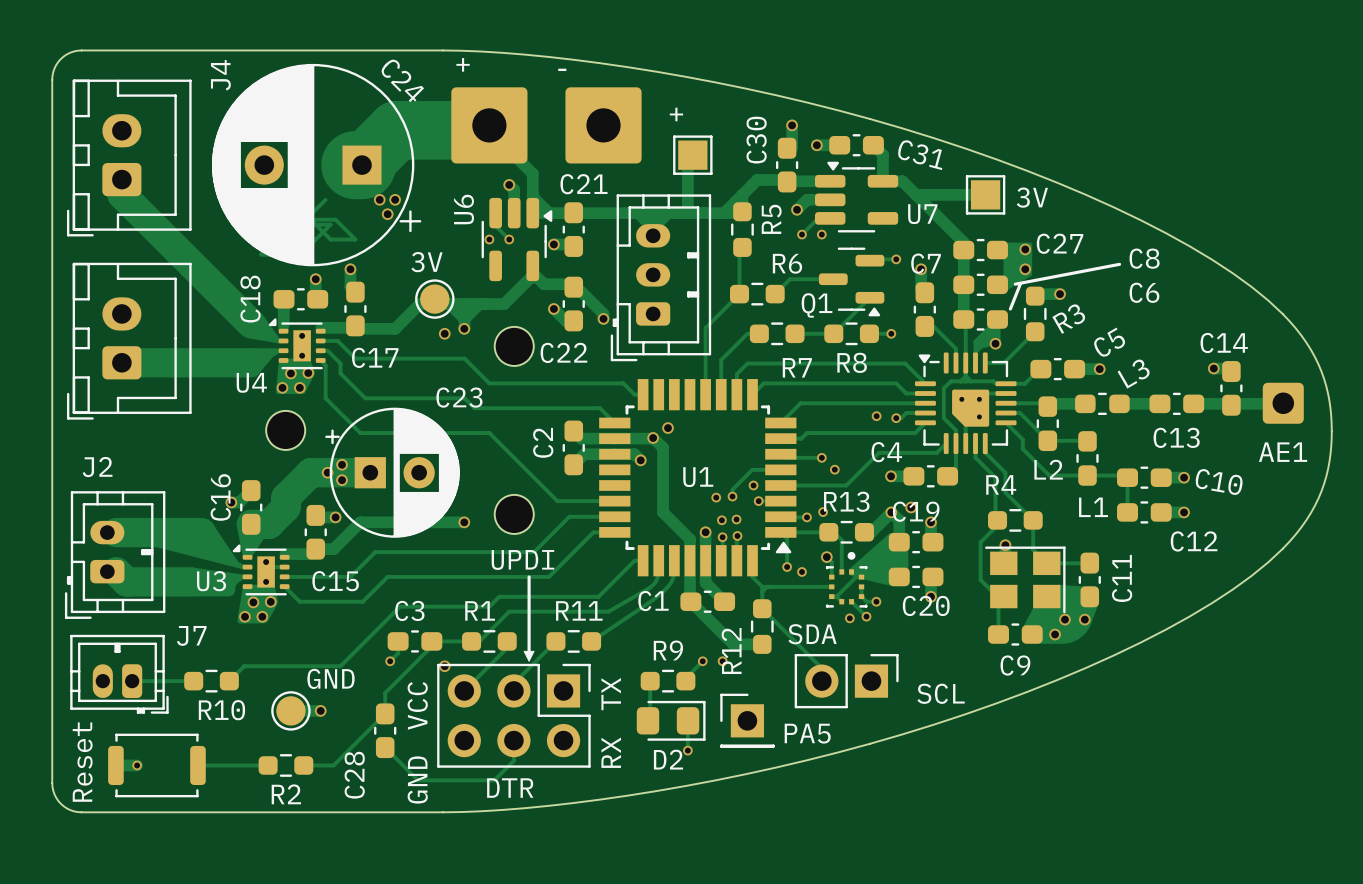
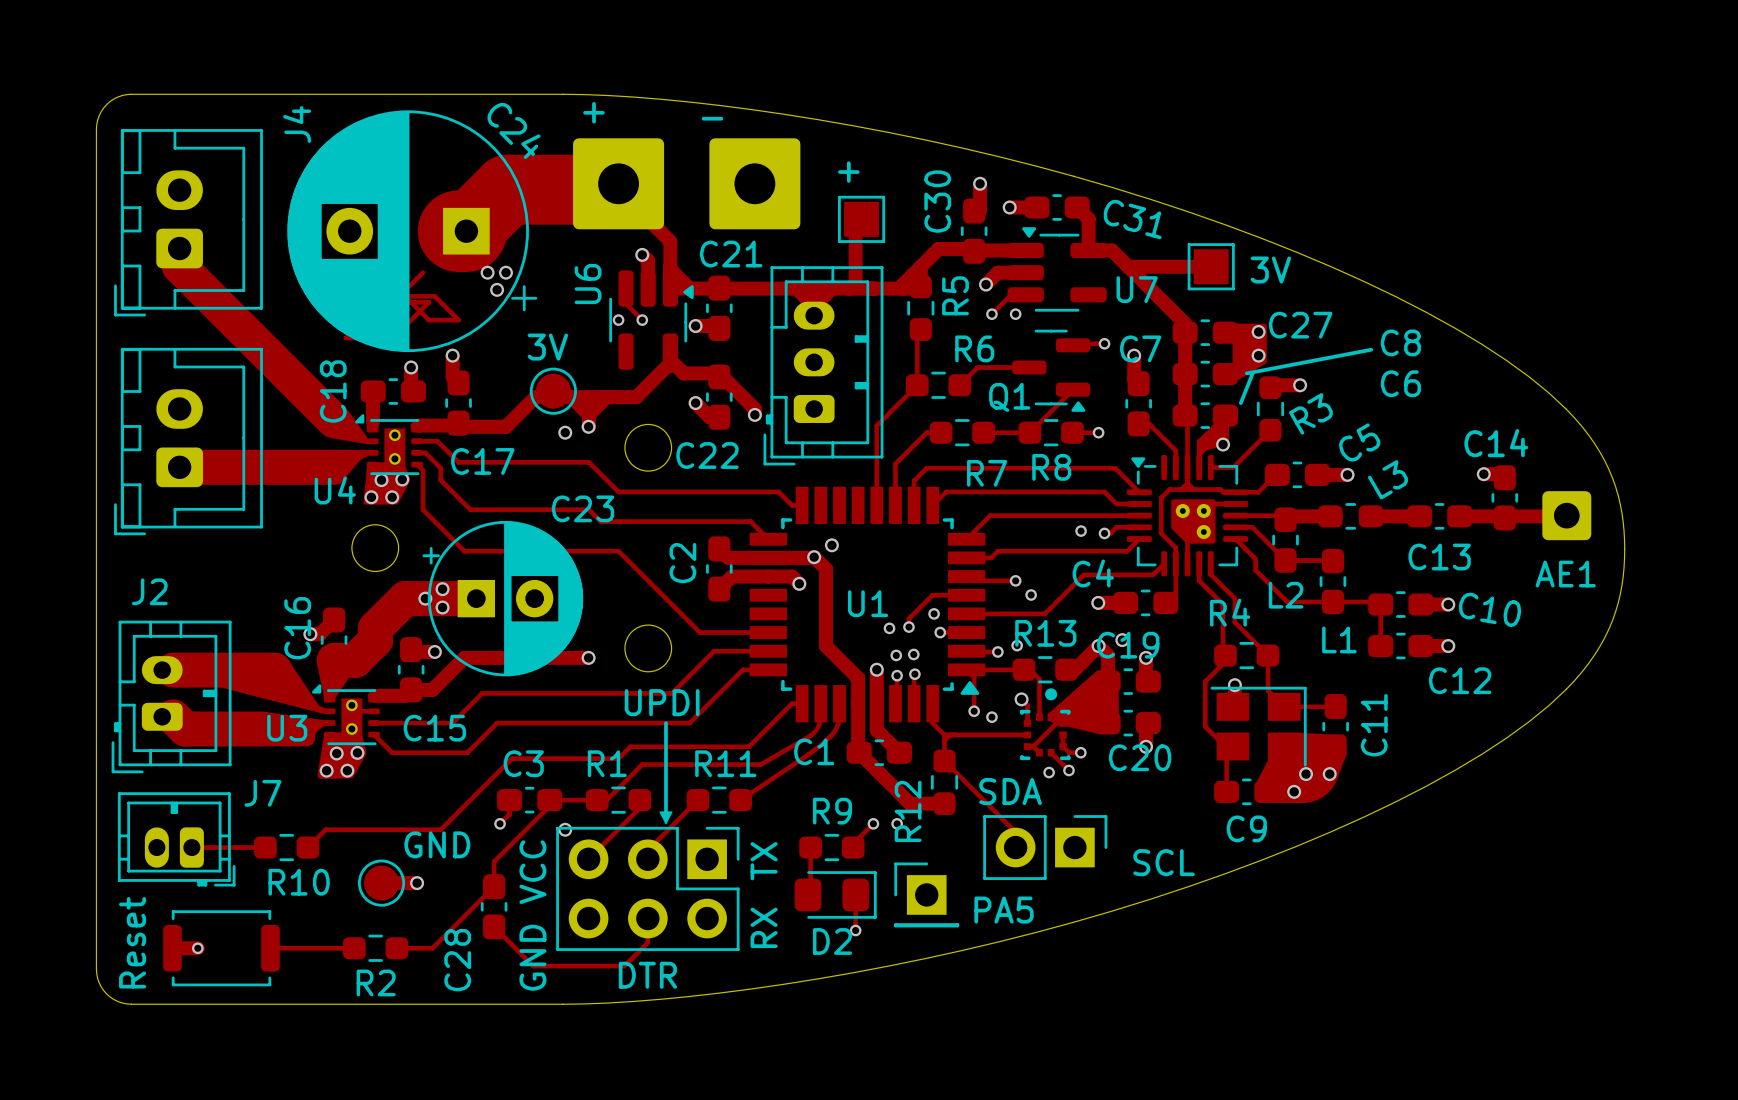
part footprint: [825, 551, 868, 608] -> [1020, 688, 1071, 761]

